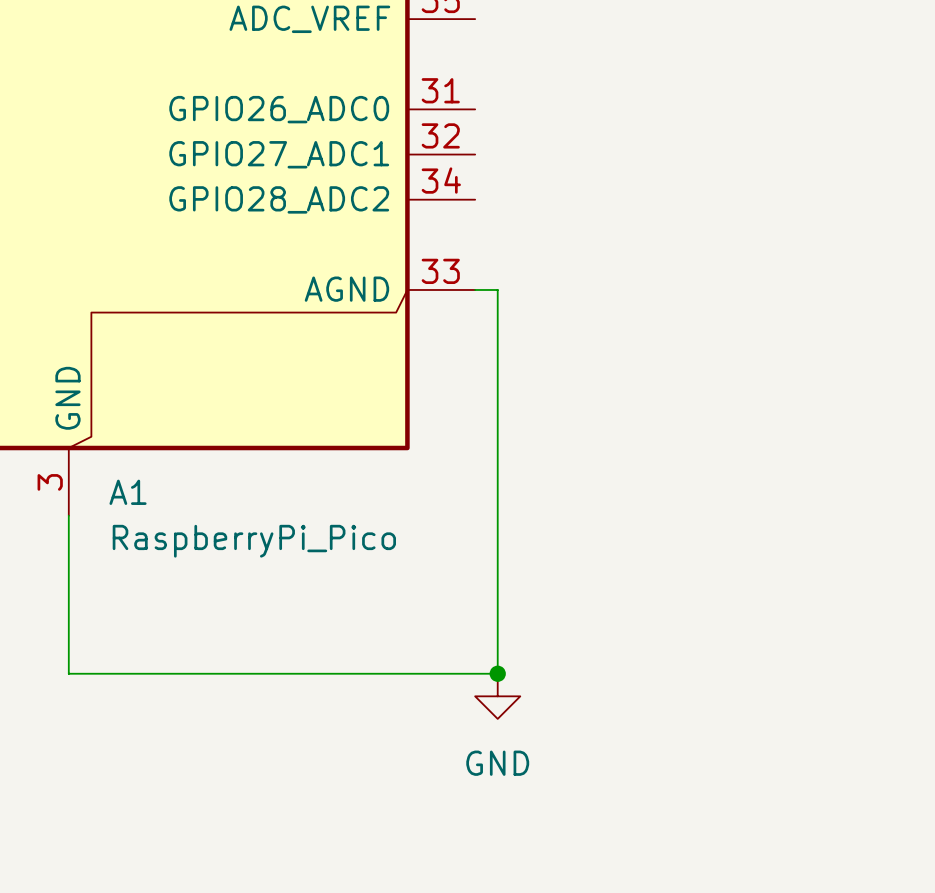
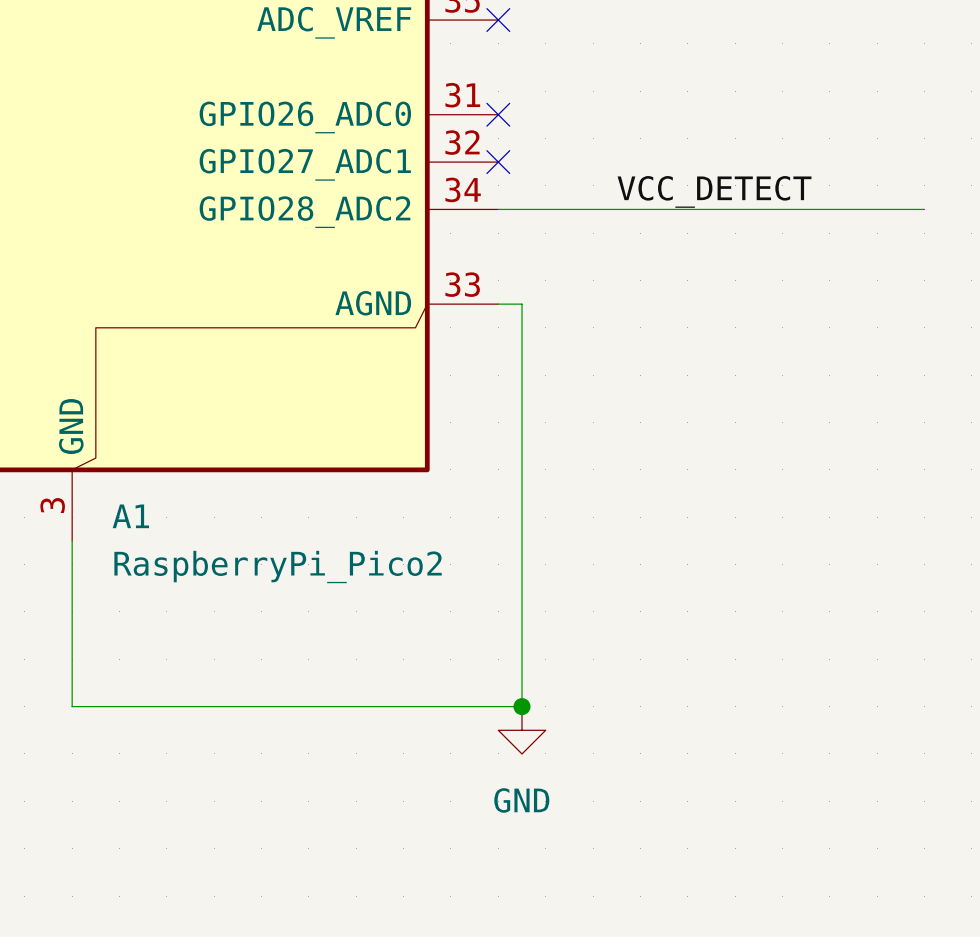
no-connect mark: none -> (498, 20)
no-connect mark: none -> (498, 114)
no-connect mark: none -> (498, 162)
label: none -> VCC_DETECT (714, 191)
wire: none -> (498, 209) (924, 209)
A1 value: RaspberryPi_Pico (254, 541) -> RaspberryPi_Pico2 (278, 567)

